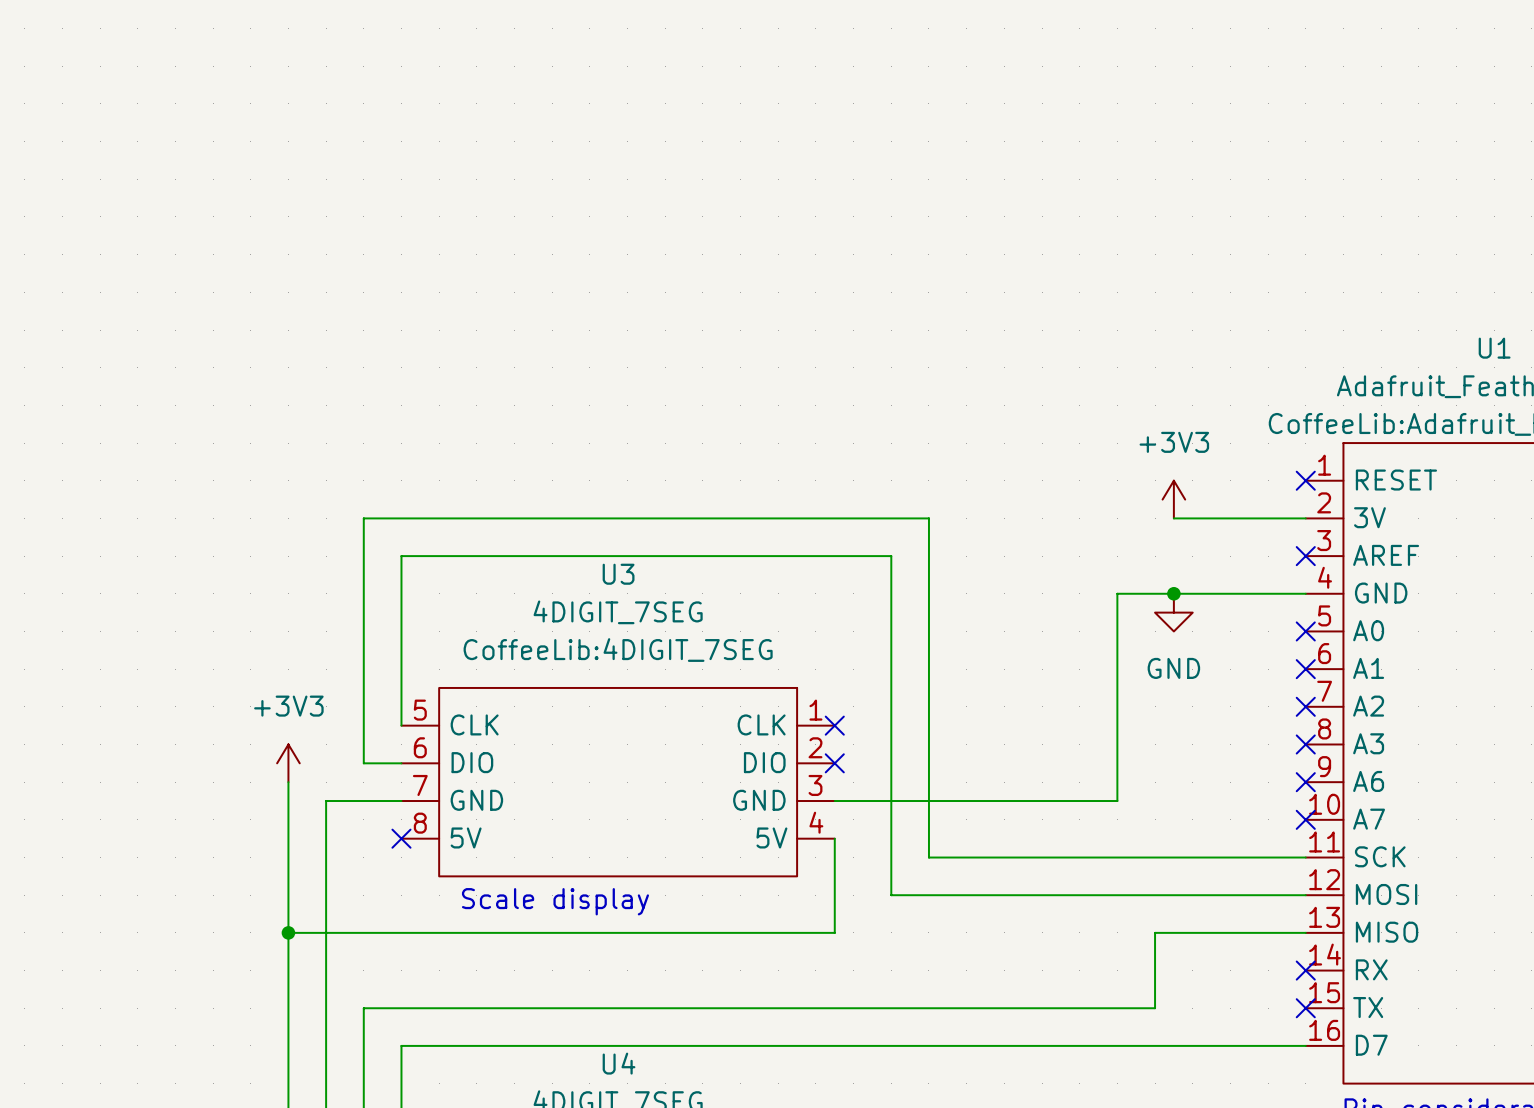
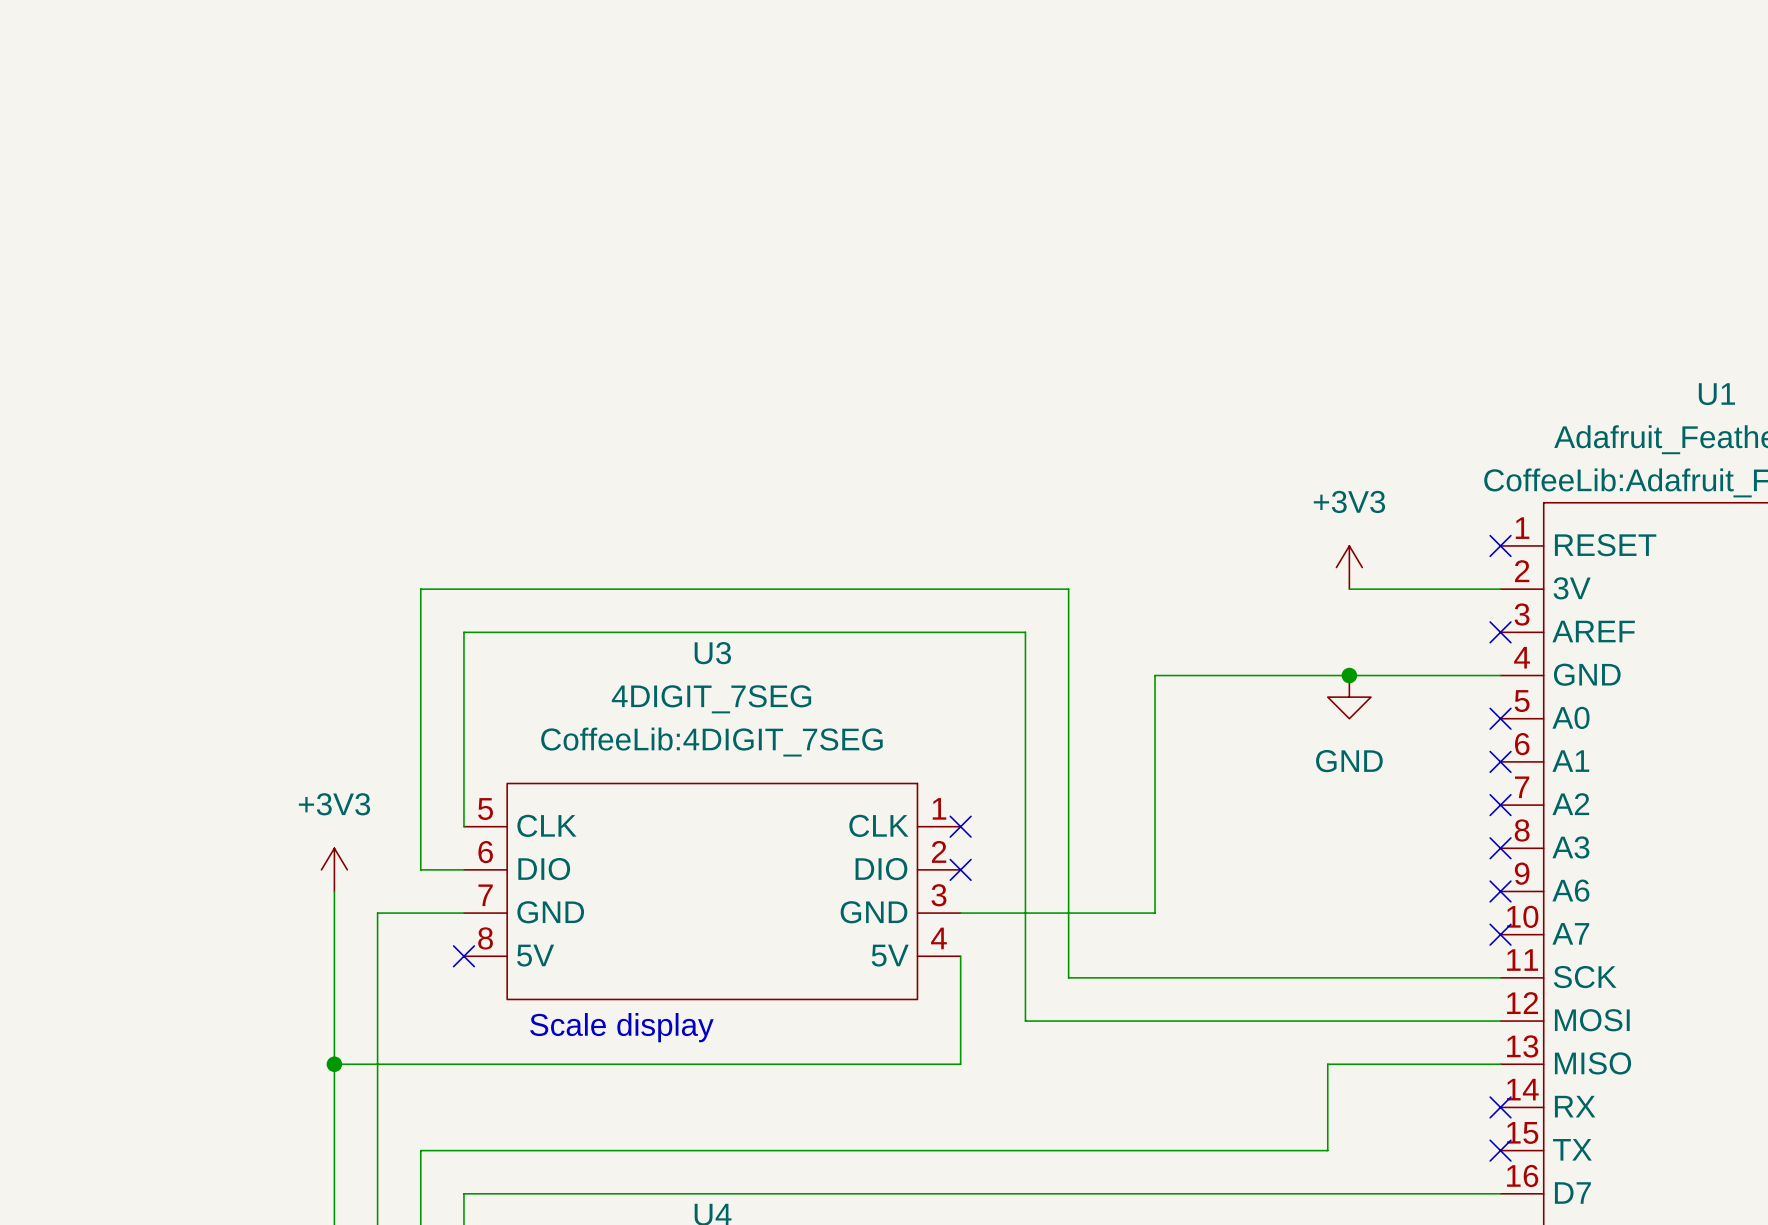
wire: (1117, 593) (1117, 801) (1004, 801) -> (1284, 675) (1155, 675) (1155, 913)

